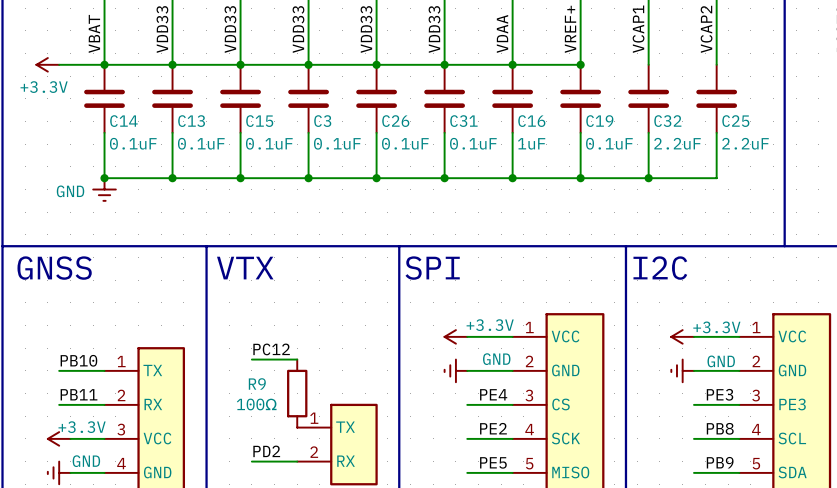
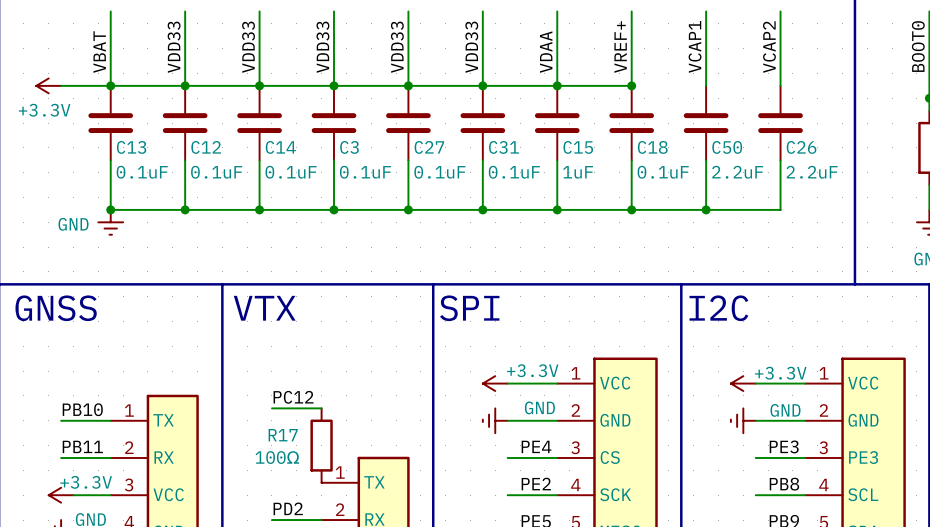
C14 name: C14 (123, 121) -> C13 (131, 147)
C13 name: C13 (191, 121) -> C12 (206, 147)
C15 name: C15 (259, 121) -> C14 (280, 147)
C26 name: C26 (395, 121) -> C27 (429, 147)
C16 name: C16 (531, 121) -> C15 (578, 147)
C19 name: C19 (599, 121) -> C18 (652, 147)
C32 name: C32 (667, 121) -> C50 (727, 147)
C25 name: C25 (735, 121) -> C26 (801, 147)
R9 name: R9 (257, 383) -> R17 (283, 435)

